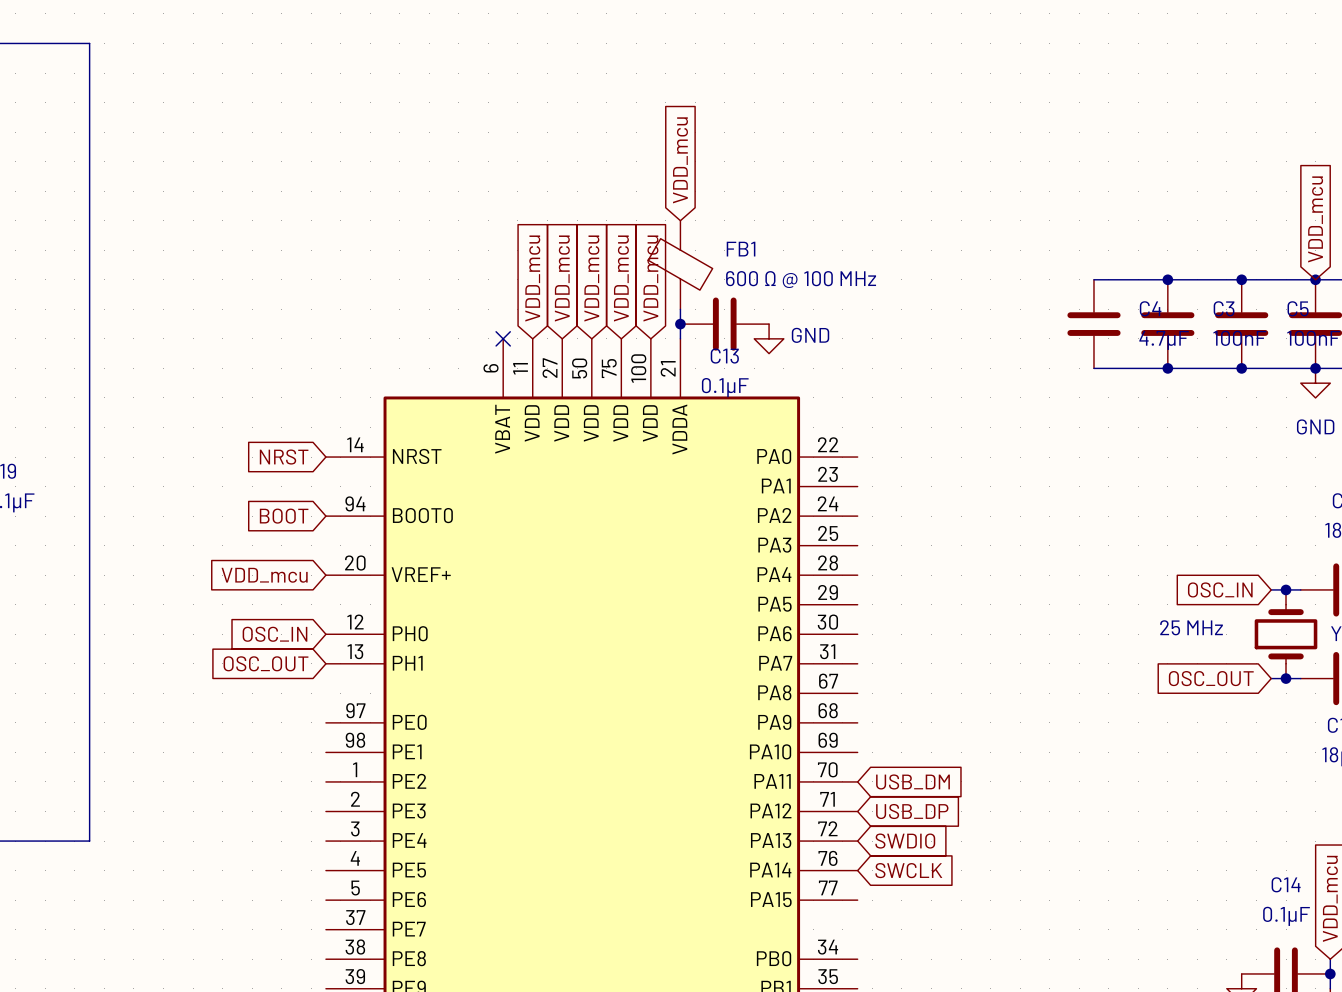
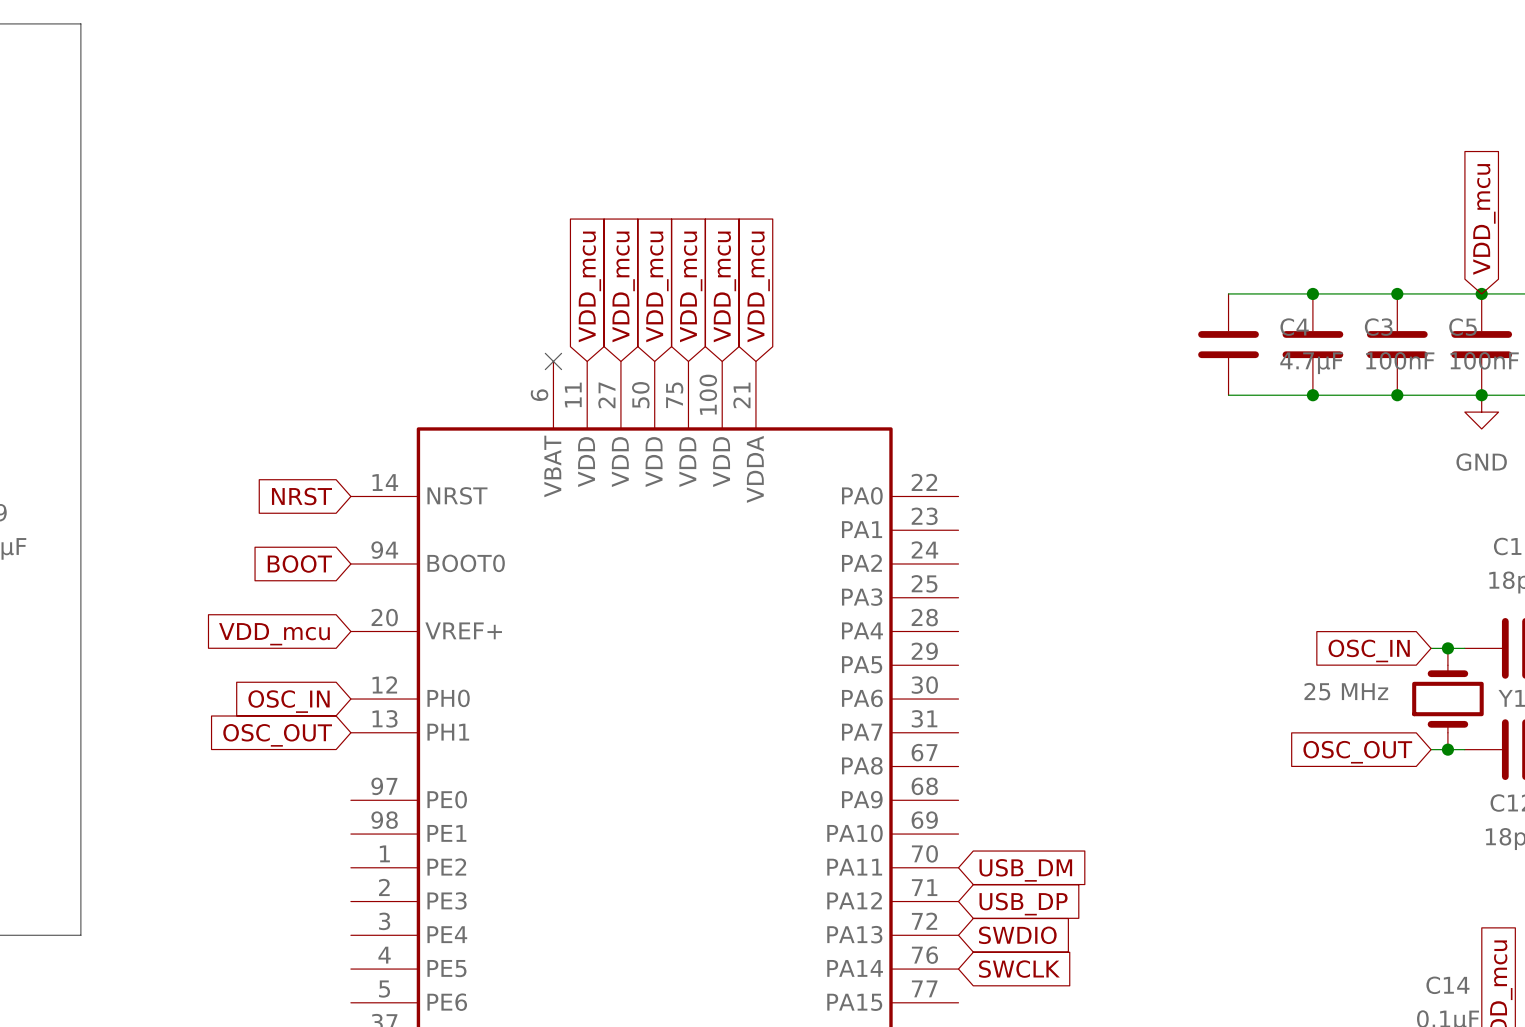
global label position: VDD_mcu (680, 160) -> VDD_mcu (758, 286)
FB1: 600 Ω @ 100 MHz (680, 265) -> none
wire: (680, 309) (680, 338) -> none
junction: (680, 324) -> none
C13: 0.1µF (724, 324) -> none
power symbol: GND (769, 338) -> none

